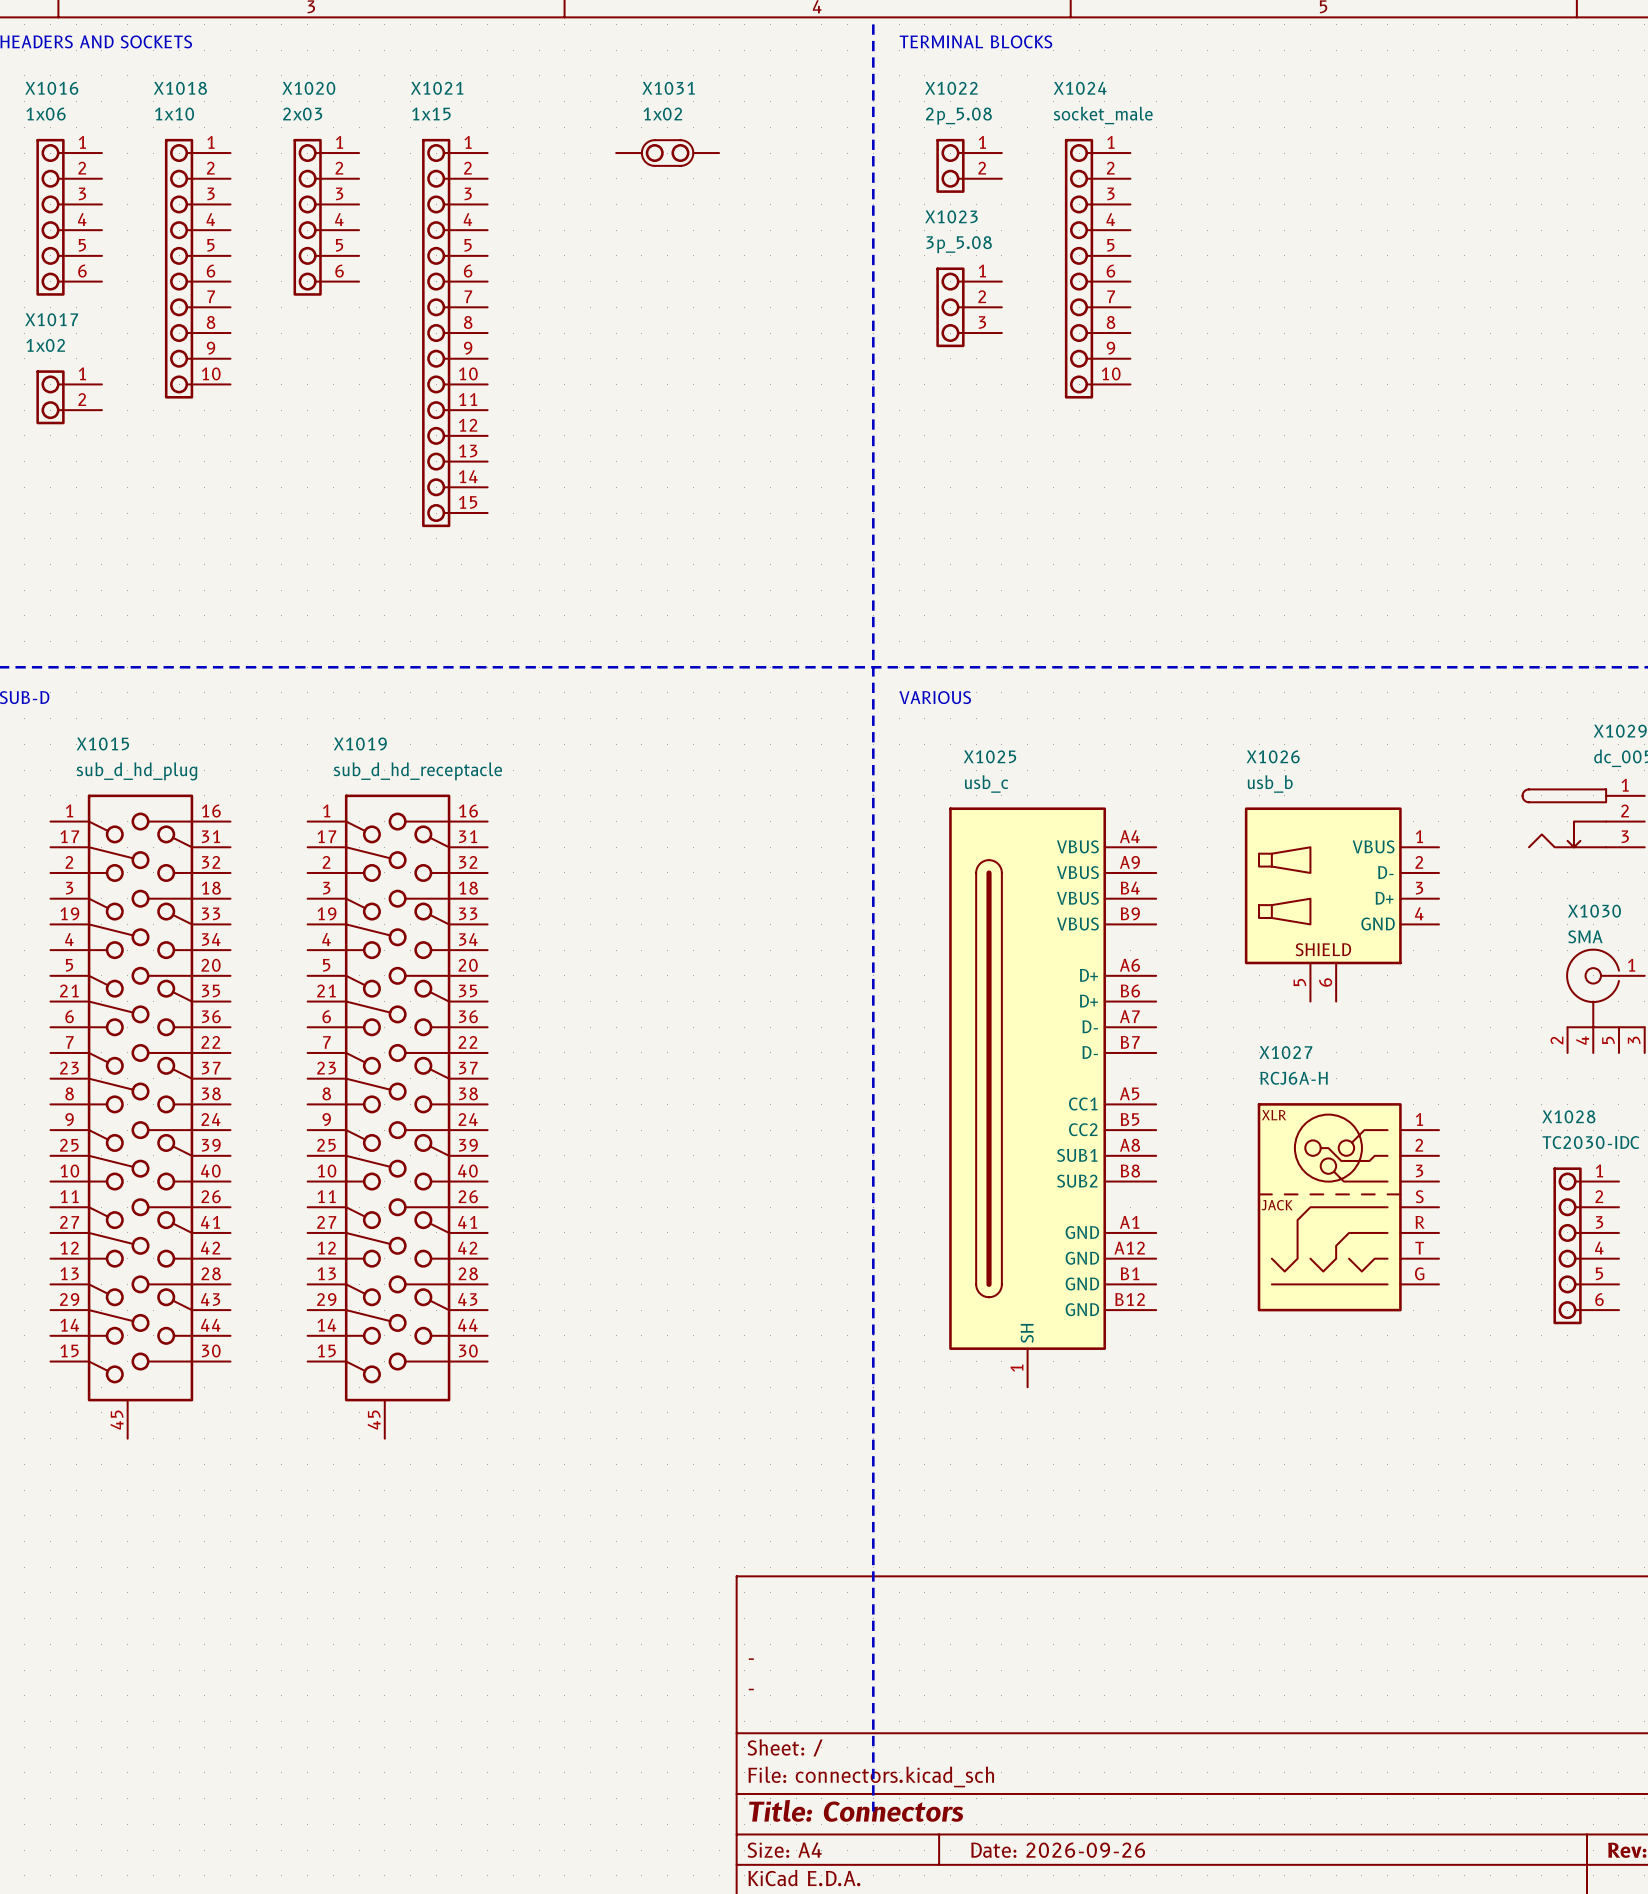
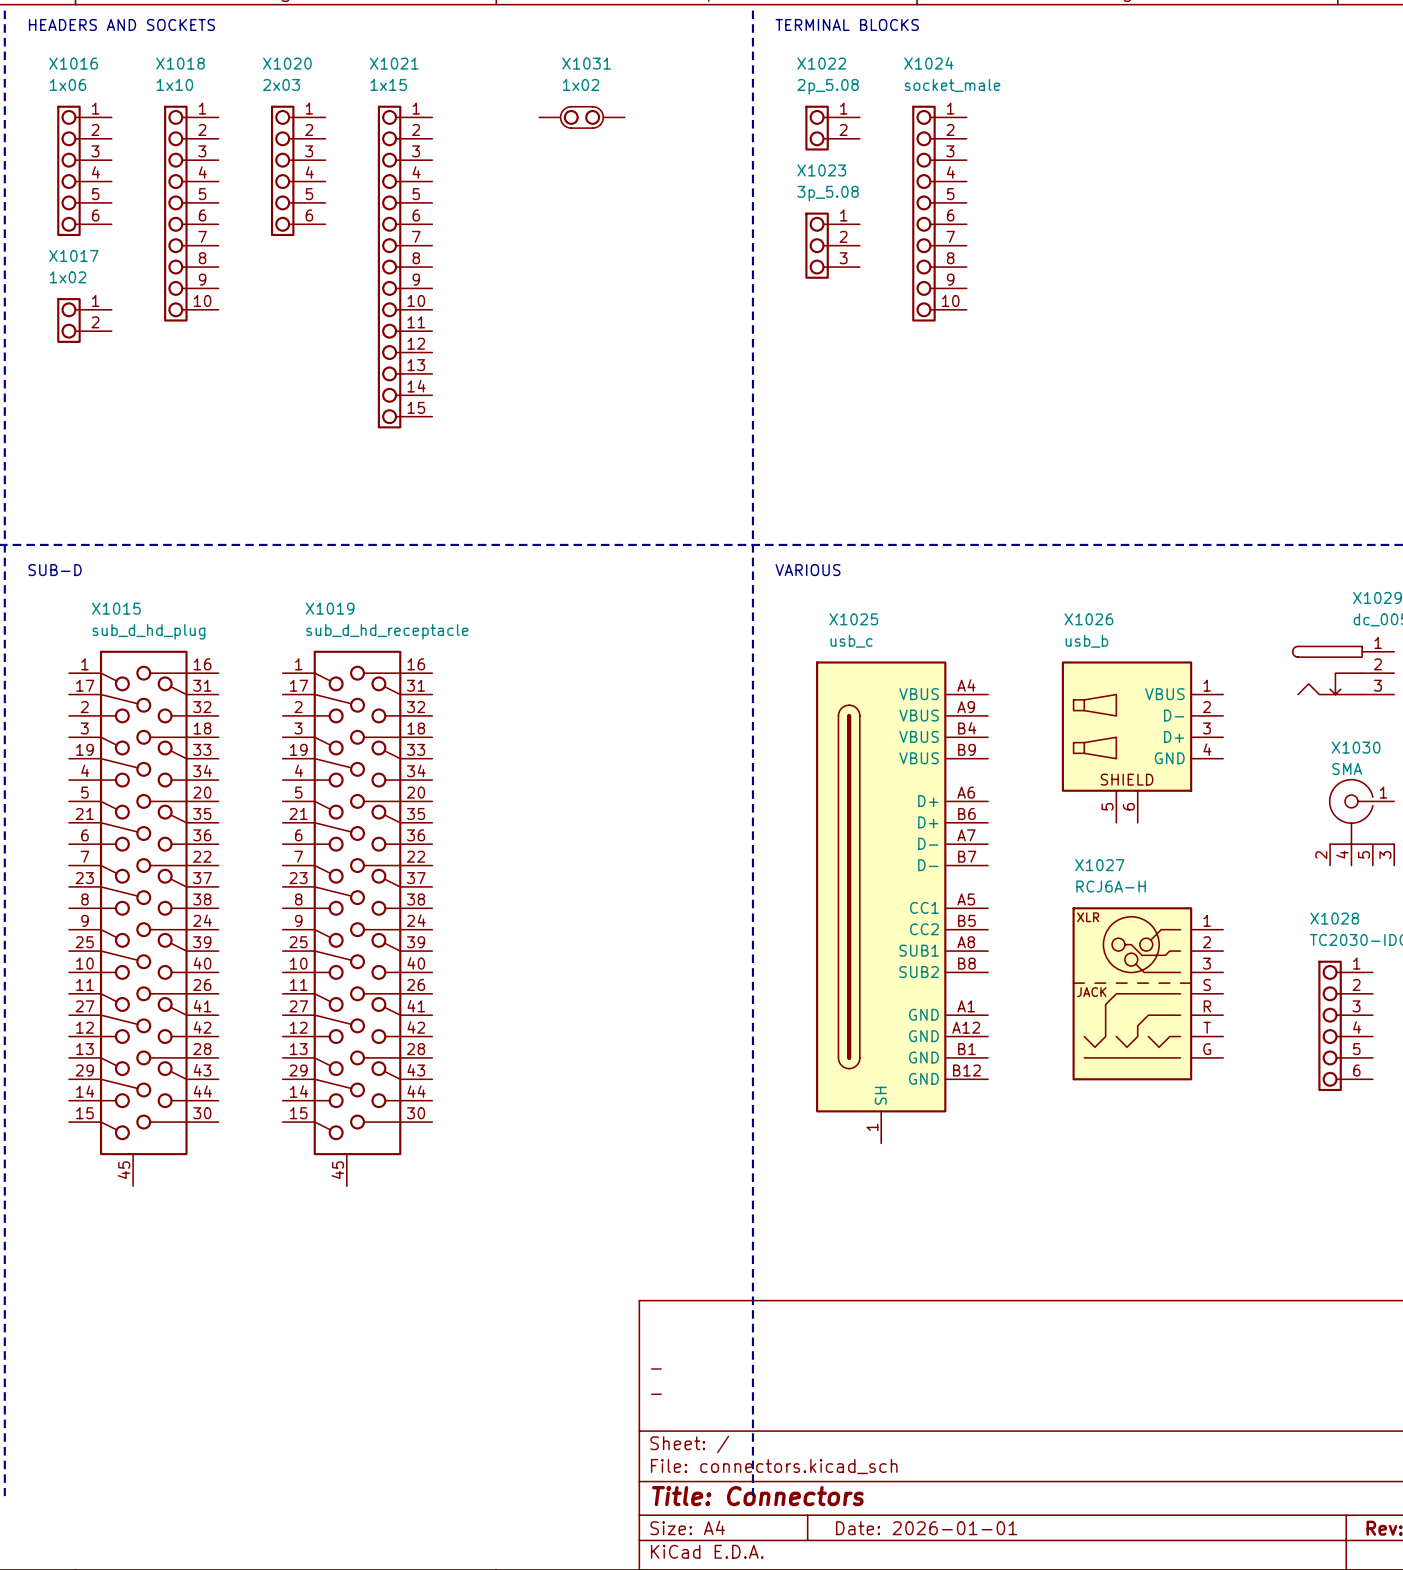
title block: Date: 2026-09-26 (1058, 1850) -> Date: 2026-01-01 (926, 1528)

